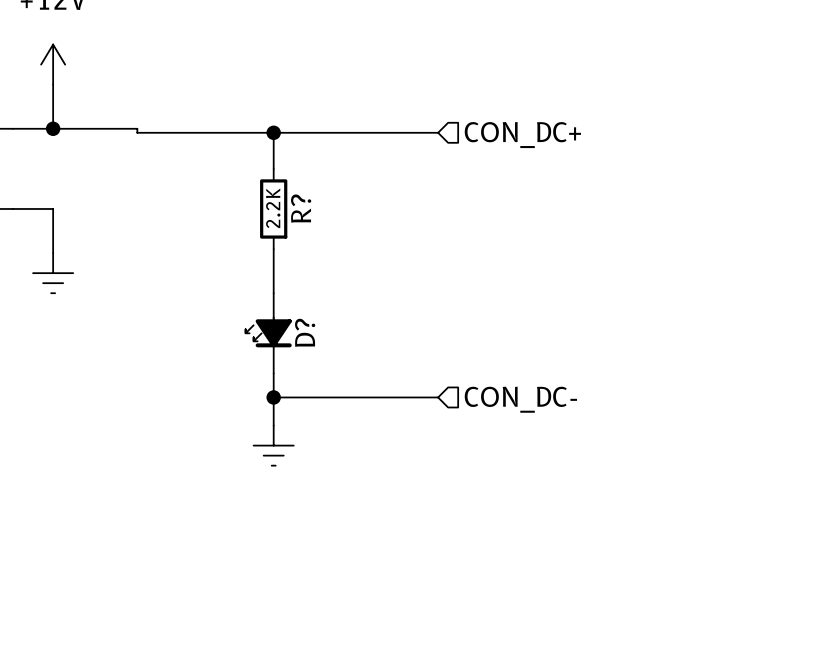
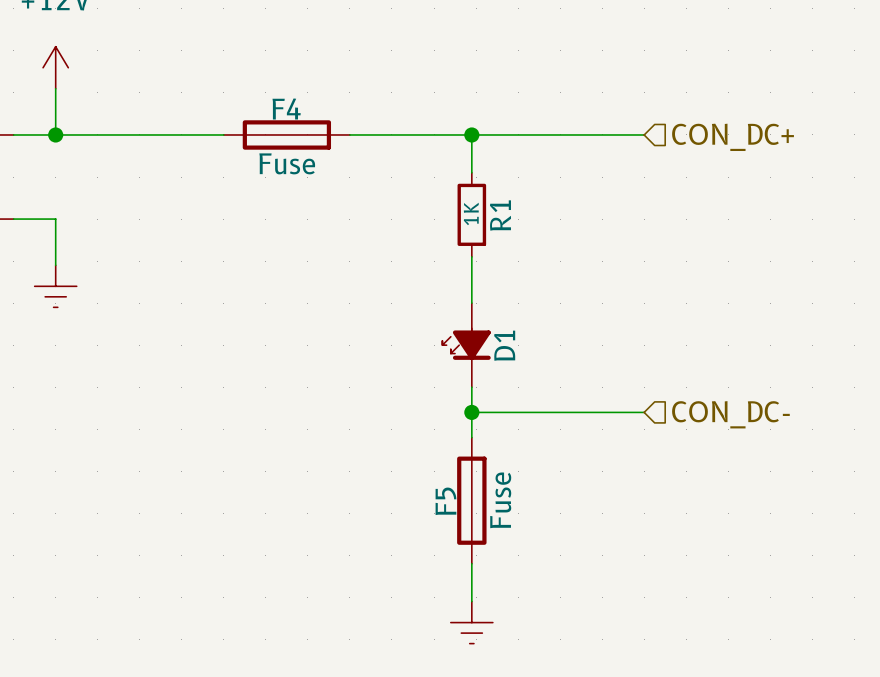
wire: (137, 128) (137, 132) (438, 132) -> (143, 134) (223, 134)
F4: none -> Fuse (286, 134)
wire: none -> (349, 134) (644, 134)
junction: none -> (471, 134)
wire: (273, 132) (273, 168) -> (471, 134) (471, 172)
junction: (273, 132) -> none
hierarchical label position: CON_DC+ (522, 135) -> CON_DC+ (733, 137)
R1: none -> 1K (471, 214)
R?: 2.2K (273, 208) -> none
wire: (273, 249) (273, 293) -> (471, 256) (471, 303)
D1: none -> (466, 345)
D?: (268, 333) -> none
wire: none -> (471, 387) (471, 437)
wire: (273, 373) (273, 425) -> none
junction: none -> (471, 412)
wire: (273, 397) (438, 397) -> (471, 412) (644, 412)
junction: (273, 397) -> none
hierarchical label position: CON_DC- (520, 399) -> CON_DC- (730, 414)
power symbol position: (273, 445) -> (471, 622)
F5: none -> Fuse (471, 500)
wire: none -> (471, 563) (471, 601)

